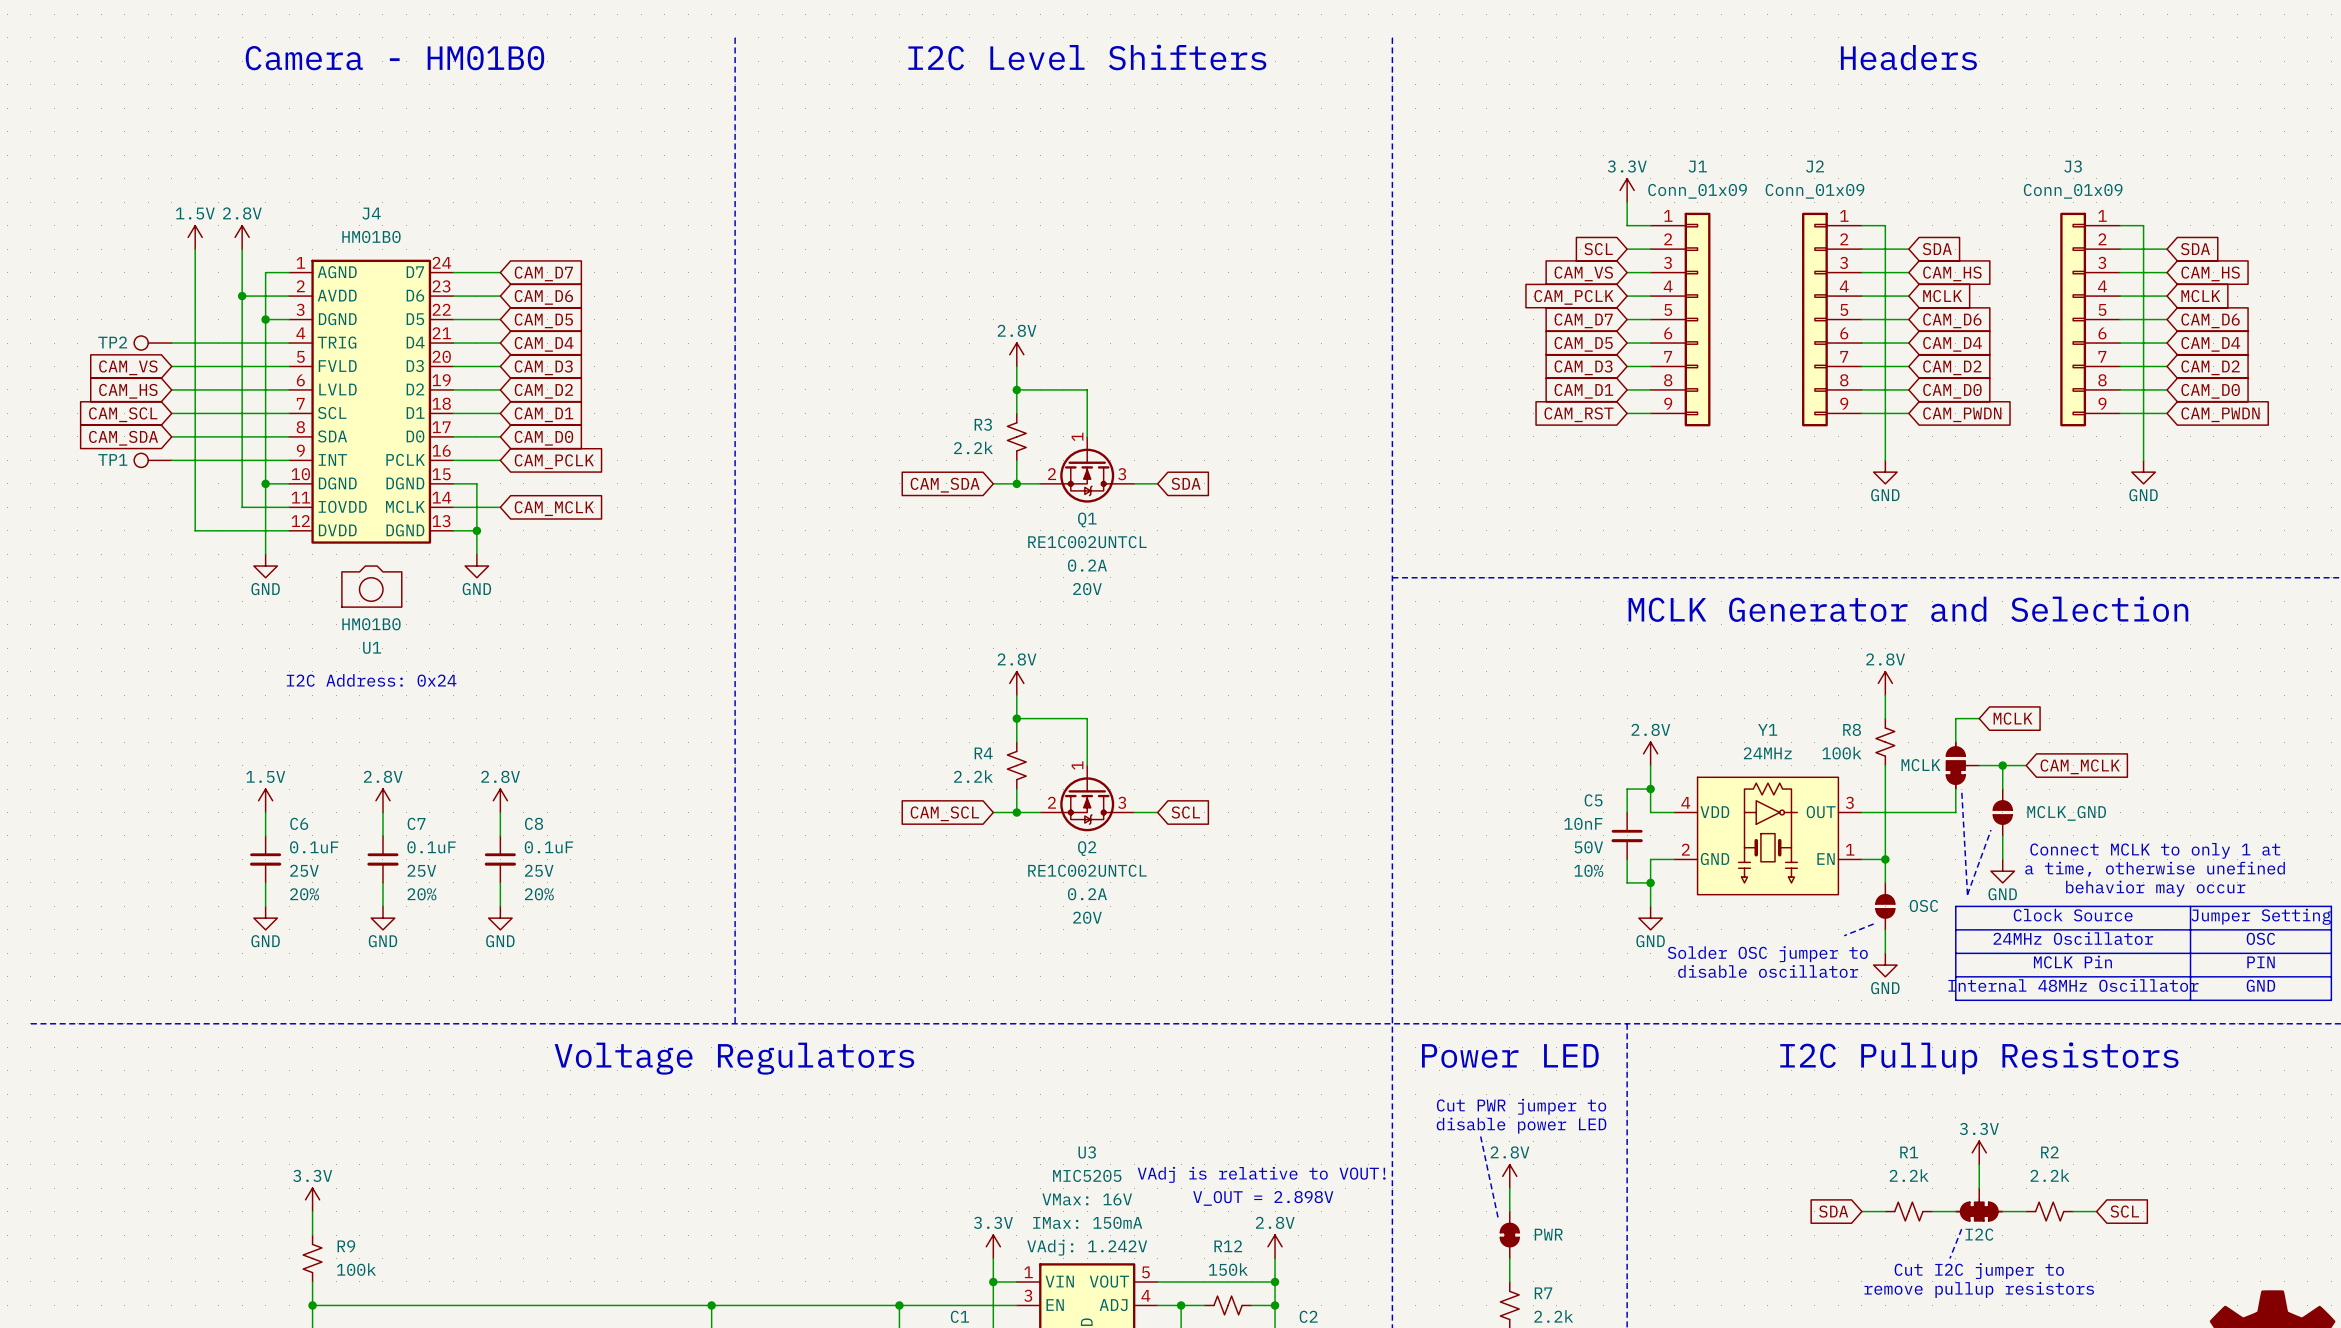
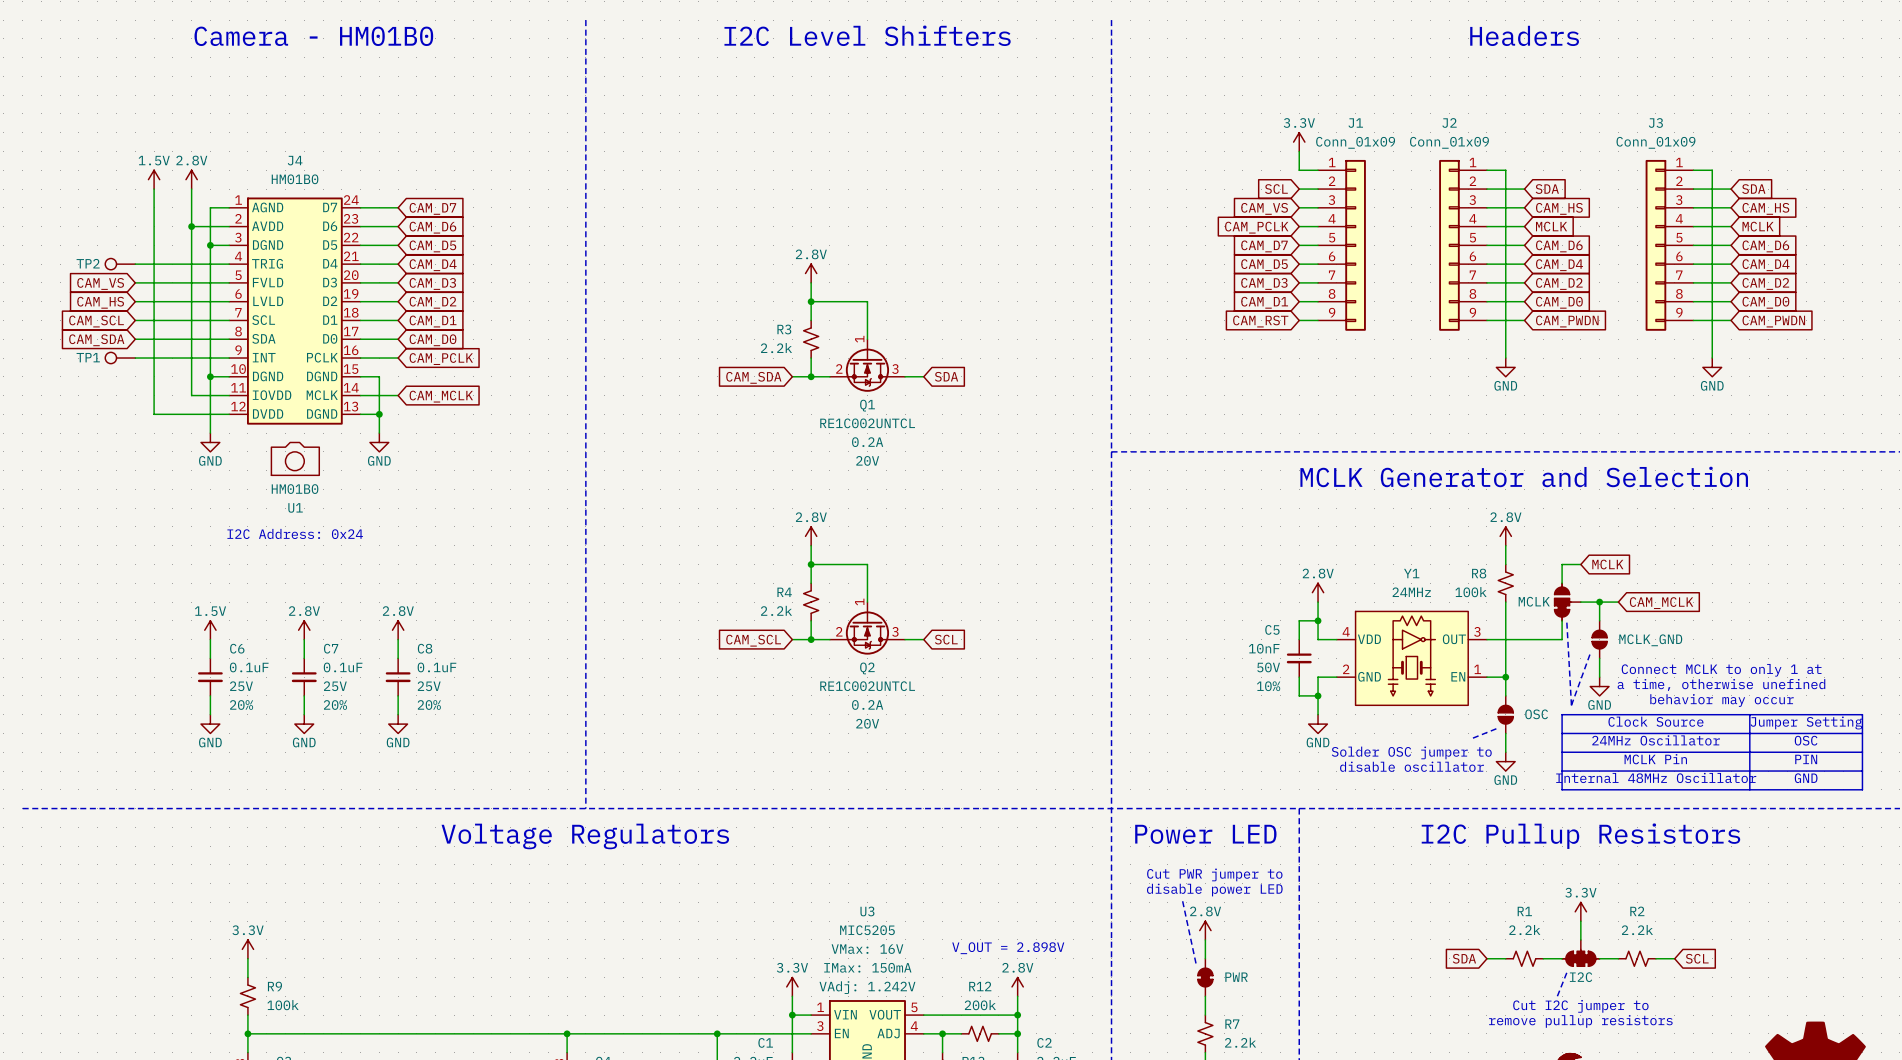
text: VAdj is relative to VOUT! (1261, 1174) -> none
R12 value: 150k (1228, 1269) -> 200k (980, 1005)

